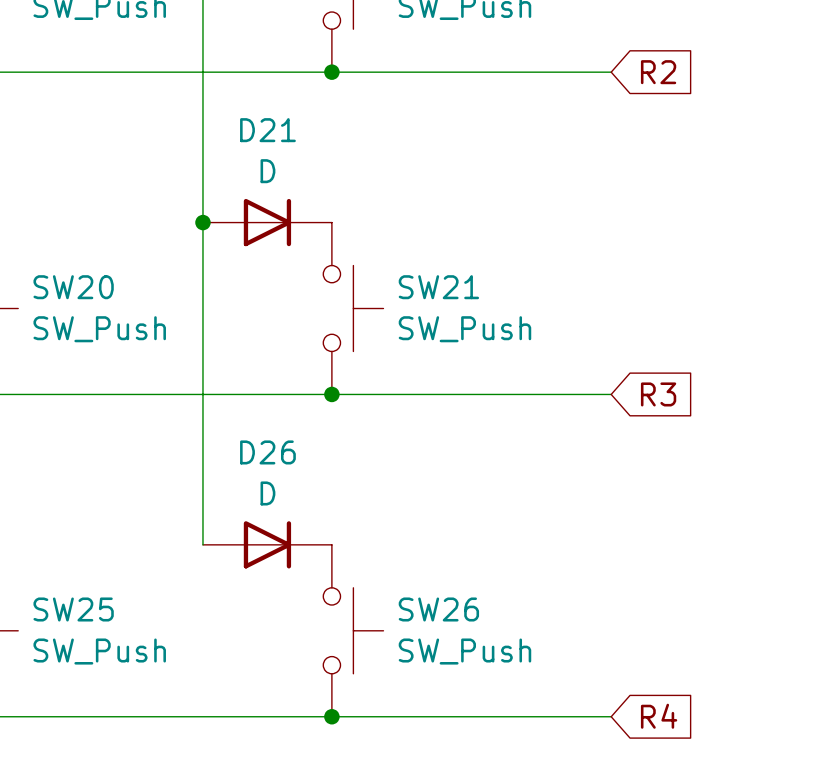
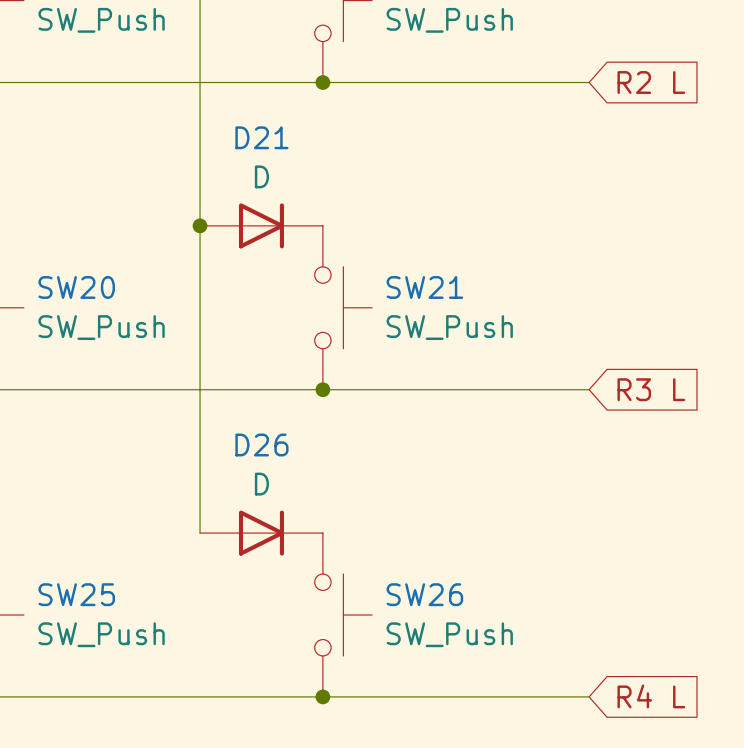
global label: R2 (658, 72) -> R2 L (651, 82)
global label: R3 (658, 394) -> R3 L (651, 389)
global label: R4 (659, 716) -> R4 L (651, 696)

